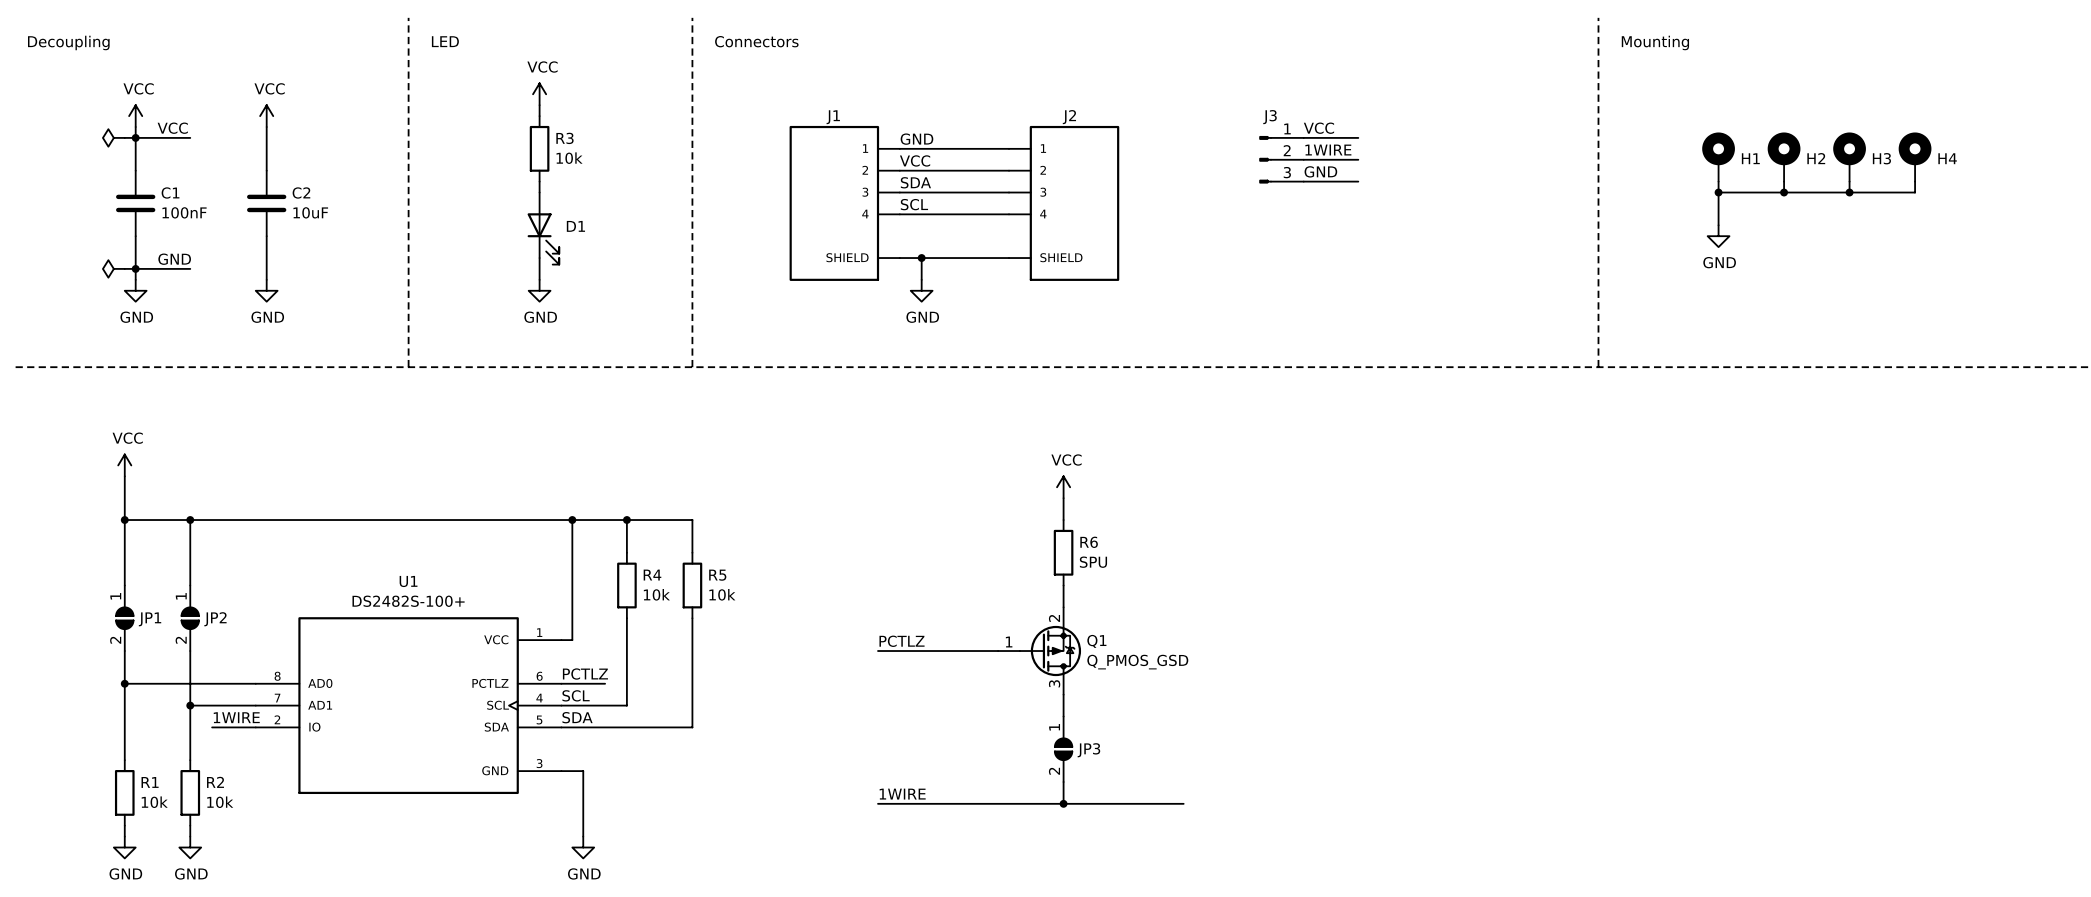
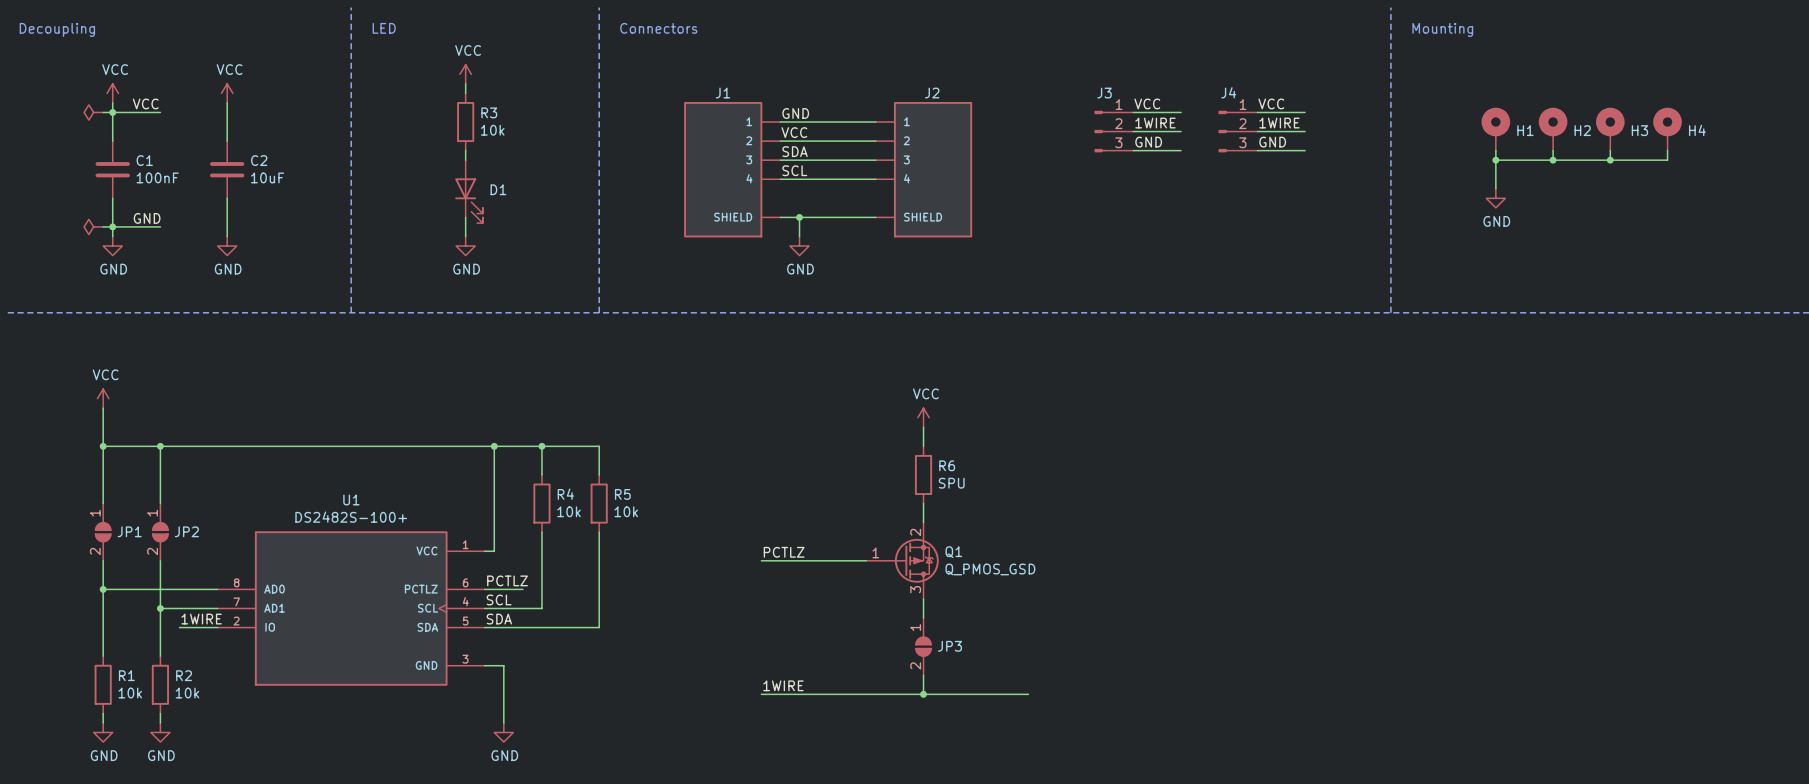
label: none -> VCC (1271, 103)
wire: none -> (1257, 112) (1305, 112)
label: none -> 1WIRE (1279, 123)
J4: none -> (1238, 131)
wire: none -> (1257, 131) (1305, 131)
label: none -> GND (1272, 142)
wire: none -> (1257, 150) (1305, 150)

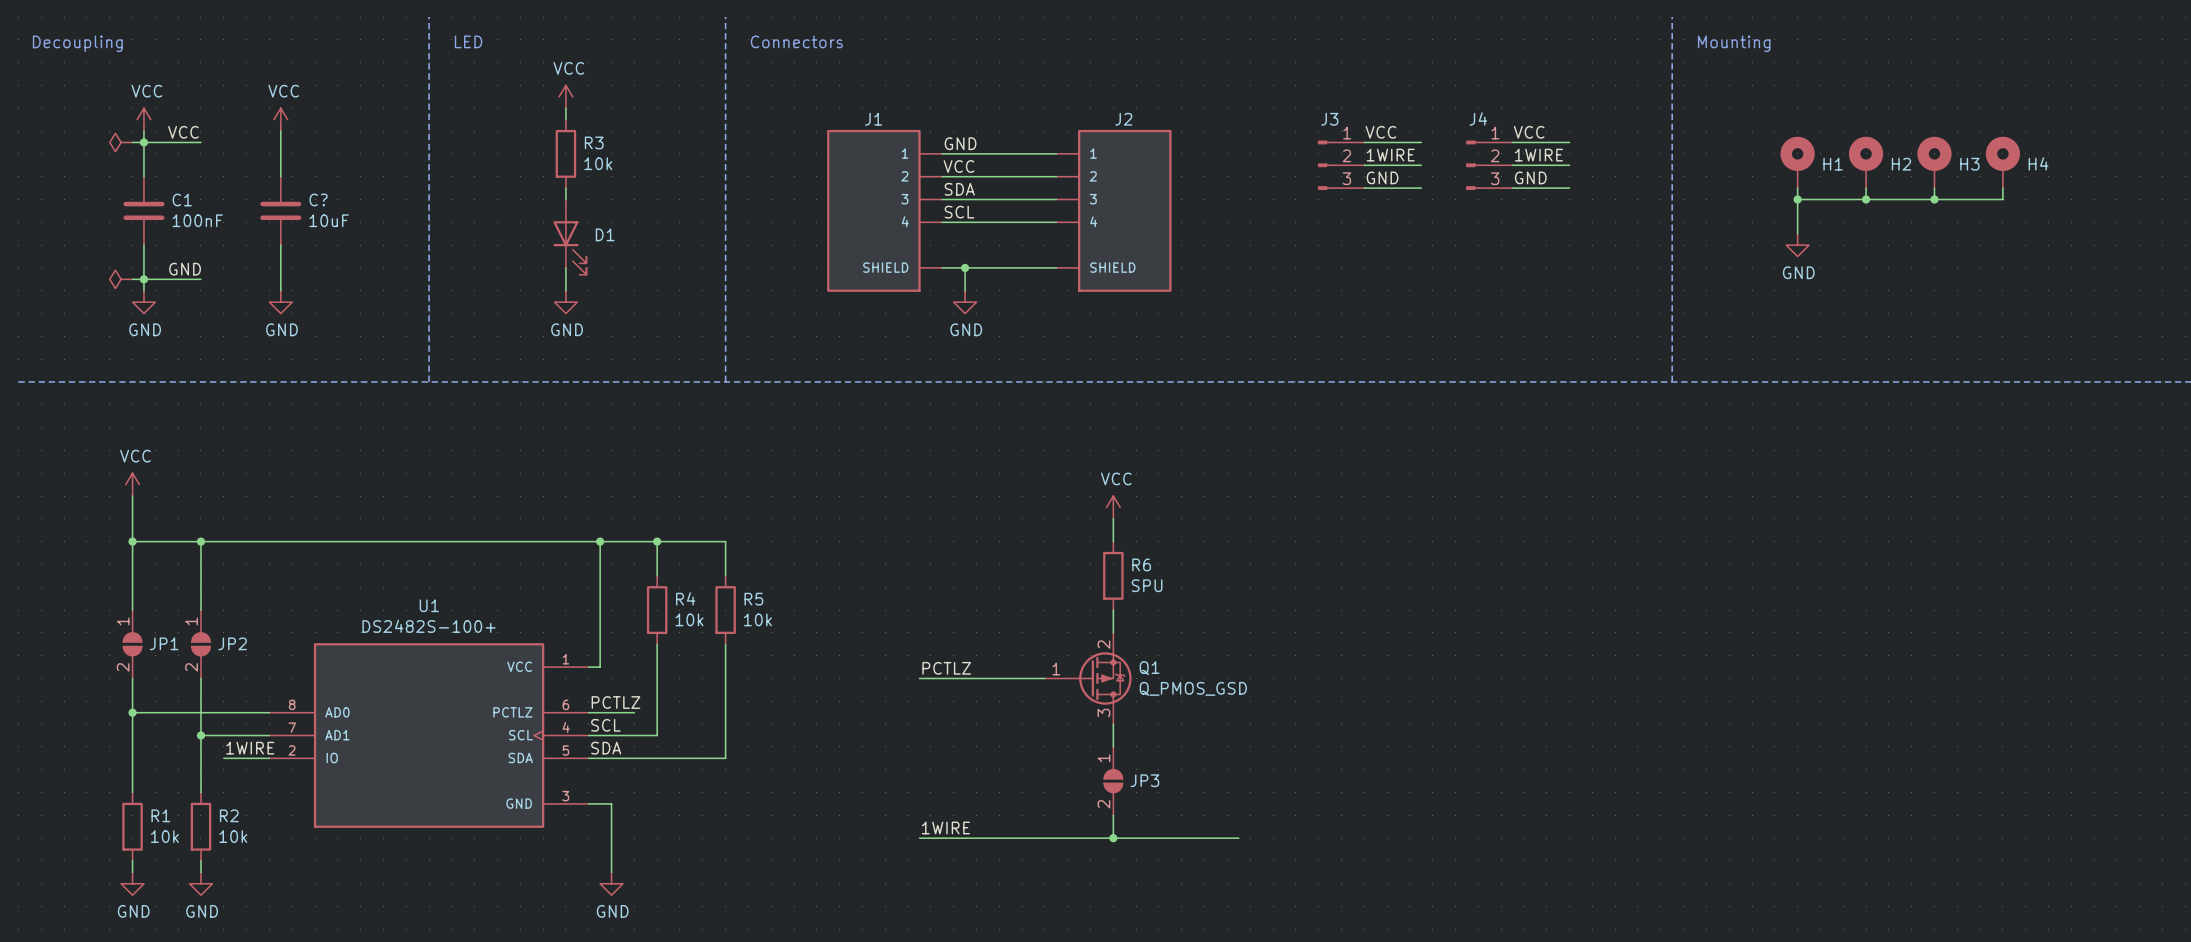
C2 name: C2 (259, 160) -> C? (318, 199)

